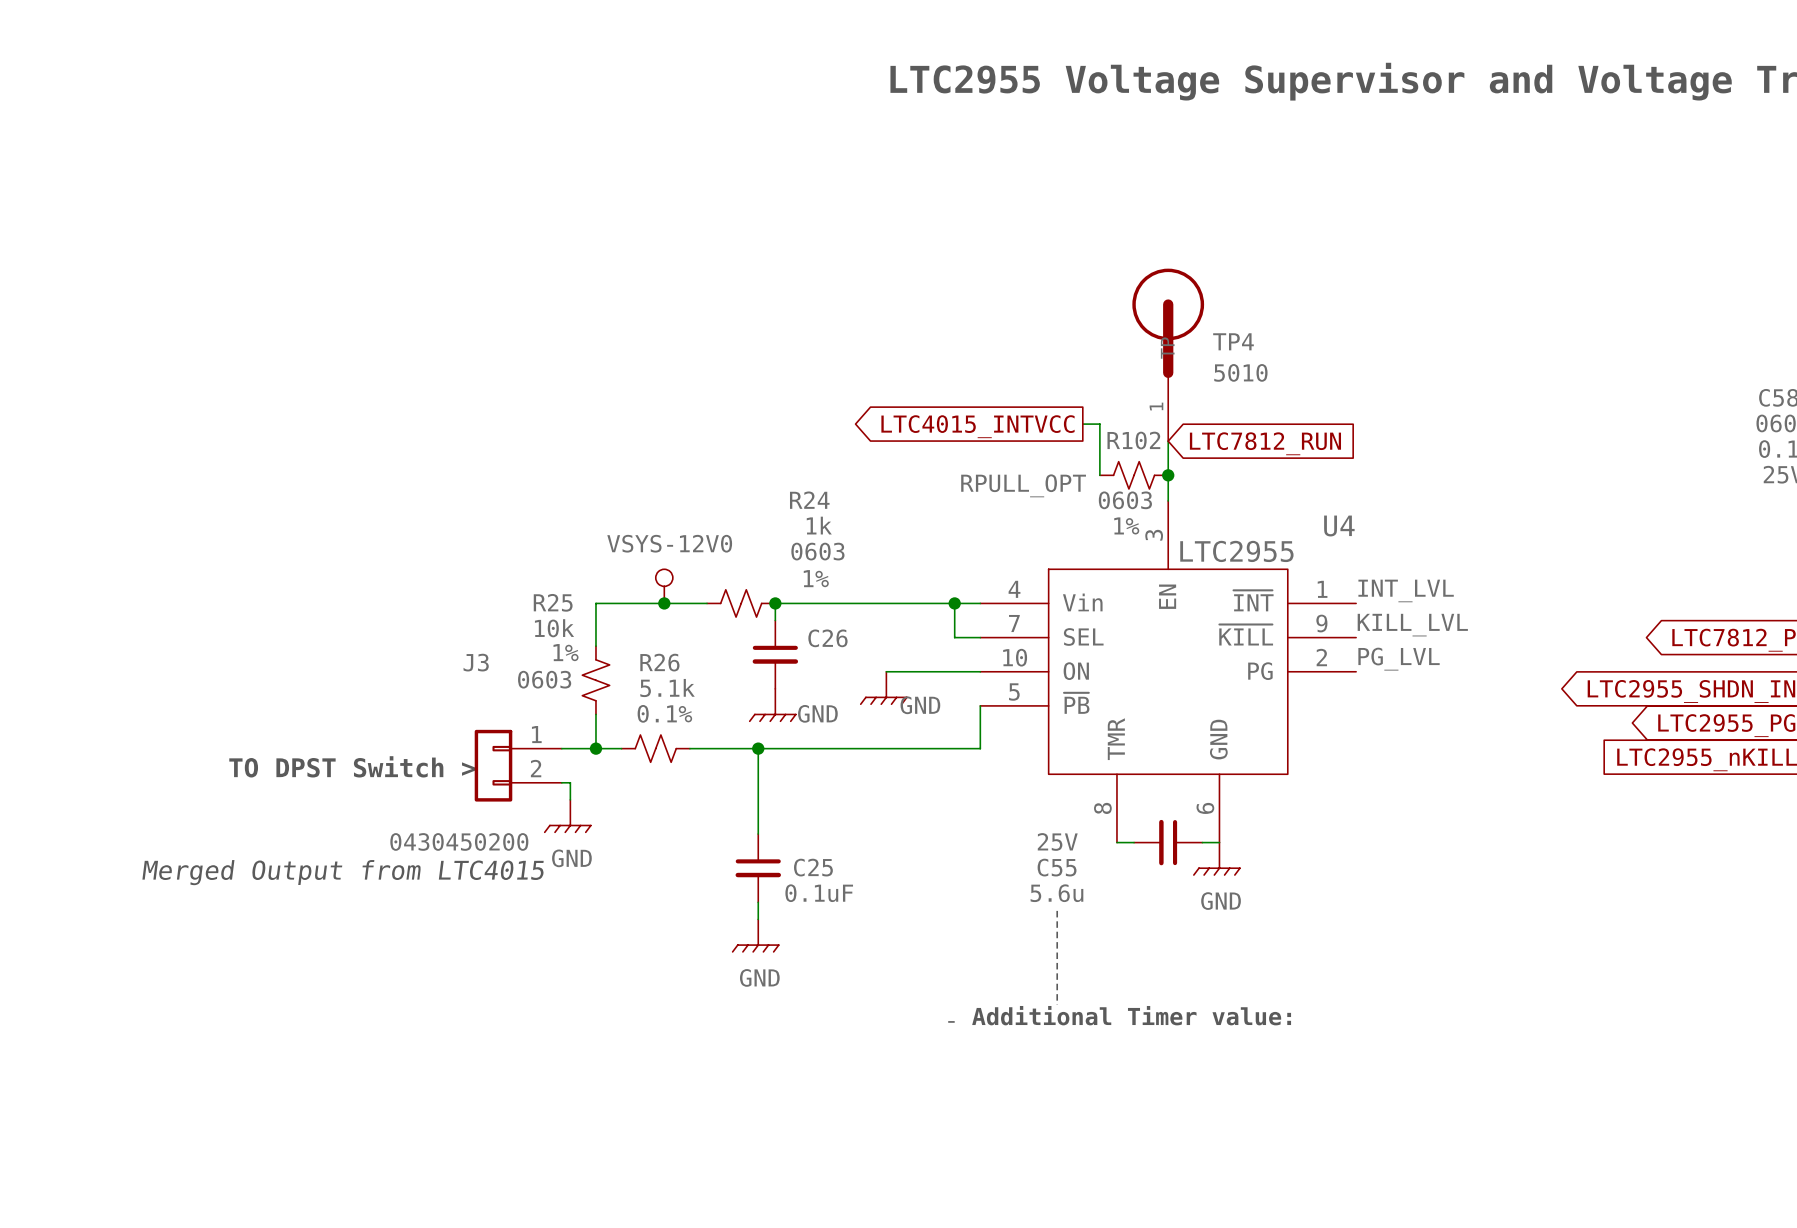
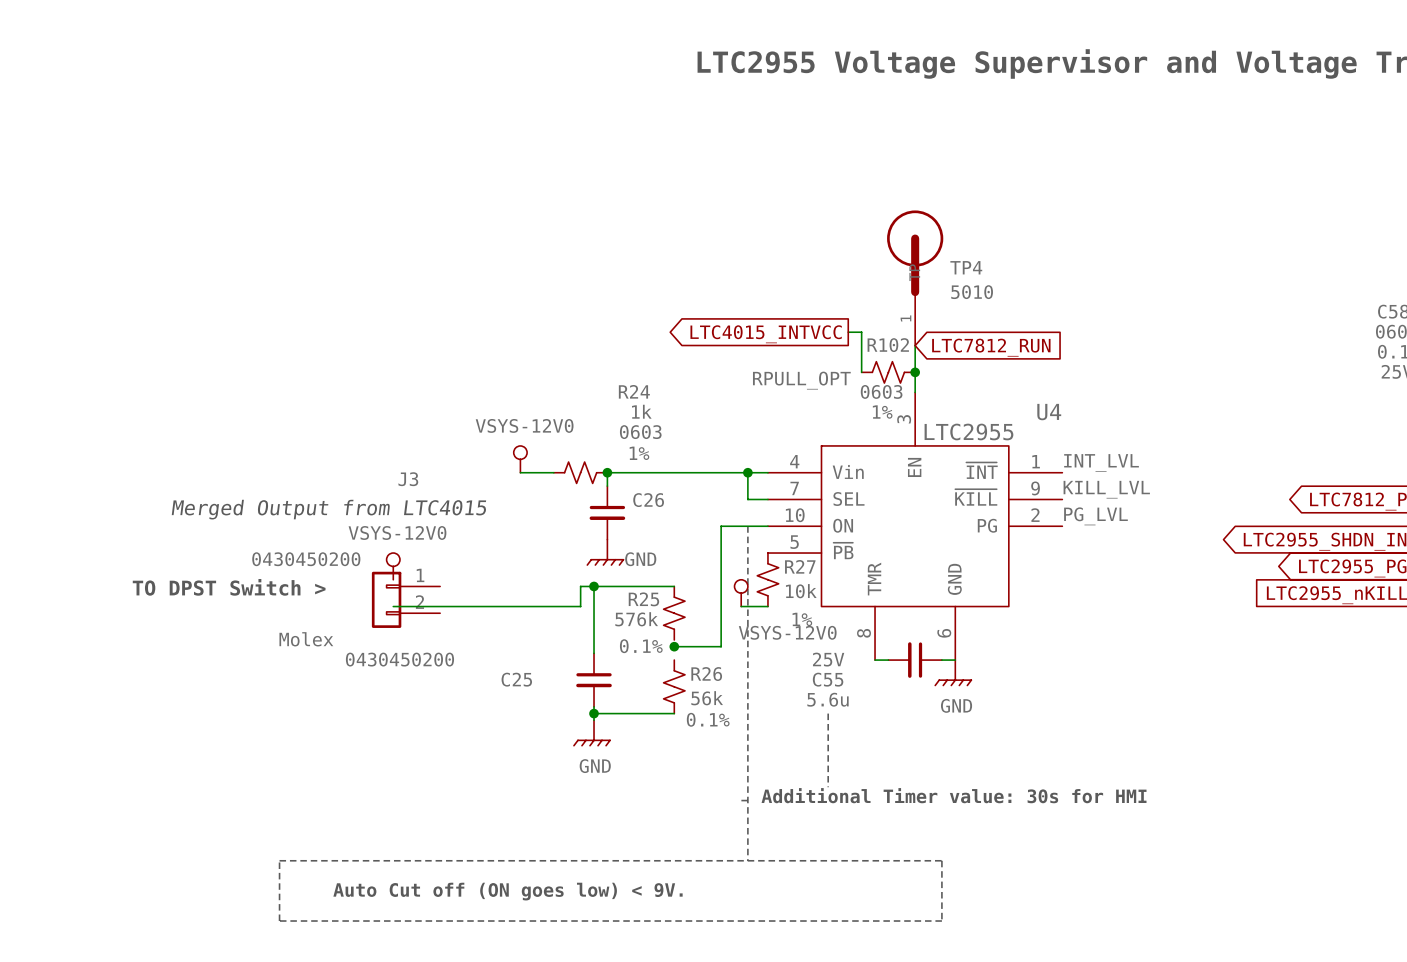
R25 name position: R25 (553, 602) -> R25 (643, 599)
wire: (664, 603) (595, 603) (595, 646) -> none
junction: (664, 603) -> none
R25 value: 10k (554, 628) -> 576k (636, 619)
R25 text: 1% (566, 652) -> 0.1% (641, 646)
J3 name position: J3 (476, 662) -> J3 (408, 479)
R26 name position: R26 (659, 662) -> R26 (706, 674)
wire: (886, 671) (920, 671) -> (674, 646) (721, 646) (721, 526)
line: none -> (747, 526) (747, 860)
R25 text: 0603 (544, 679) -> none
R25 position: (595, 680) -> (674, 613)
power symbol: GND (883, 687) -> none
R26 value: 5.1k (667, 688) -> 56k (707, 698)
wire: (980, 705) (980, 748) (860, 748) -> none
R26 text position: 0.1% (664, 713) -> 0.1% (708, 719)
wire: (595, 714) (595, 748) -> none
power symbol: none -> VSYS-12V0 (393, 566)
R27: none -> 10k (767, 579)
wire: (561, 748) (621, 748) -> none
junction: (595, 748) -> none
R26 rotation: 0° (655, 748) -> 90° clockwise (674, 686)
R26 position: (655, 748) -> (674, 686)
wire: (689, 748) (741, 748) -> (393, 606) (580, 606) (580, 586)
power symbol: none -> VSYS-12V0 (741, 593)
text position: TO DPST Switch > (352, 766) -> TO DPST Switch > (229, 587)
wire: none -> (741, 606) (767, 606)
wire: (561, 782) (570, 782) (570, 799) -> none
J3 text: none -> Molex (306, 639)
power symbol: GND (567, 816) -> none
junction: none -> (674, 646)
J3 text position: 0430450200 (459, 841) -> 0430450200 (306, 559)
J3 value: none -> 0430450200 (399, 659)
C25 name position: C25 (813, 867) -> C25 (516, 679)
text position: Merged Output from LTC4015 (343, 872) -> Merged Output from LTC4015 (328, 509)
C25 value: 0.1uF (819, 893) -> none
wire: none -> (594, 713) (674, 713)
junction: none -> (594, 713)
text: Additional Timer value: (1131, 1015) -> Additional Timer value: 30s for HMI (954, 795)
line: none -> (279, 860) (941, 860) (941, 921) (279, 921) (279, 860)
text: none -> Auto Cut off (ON goes low) < 9V. (508, 891)

